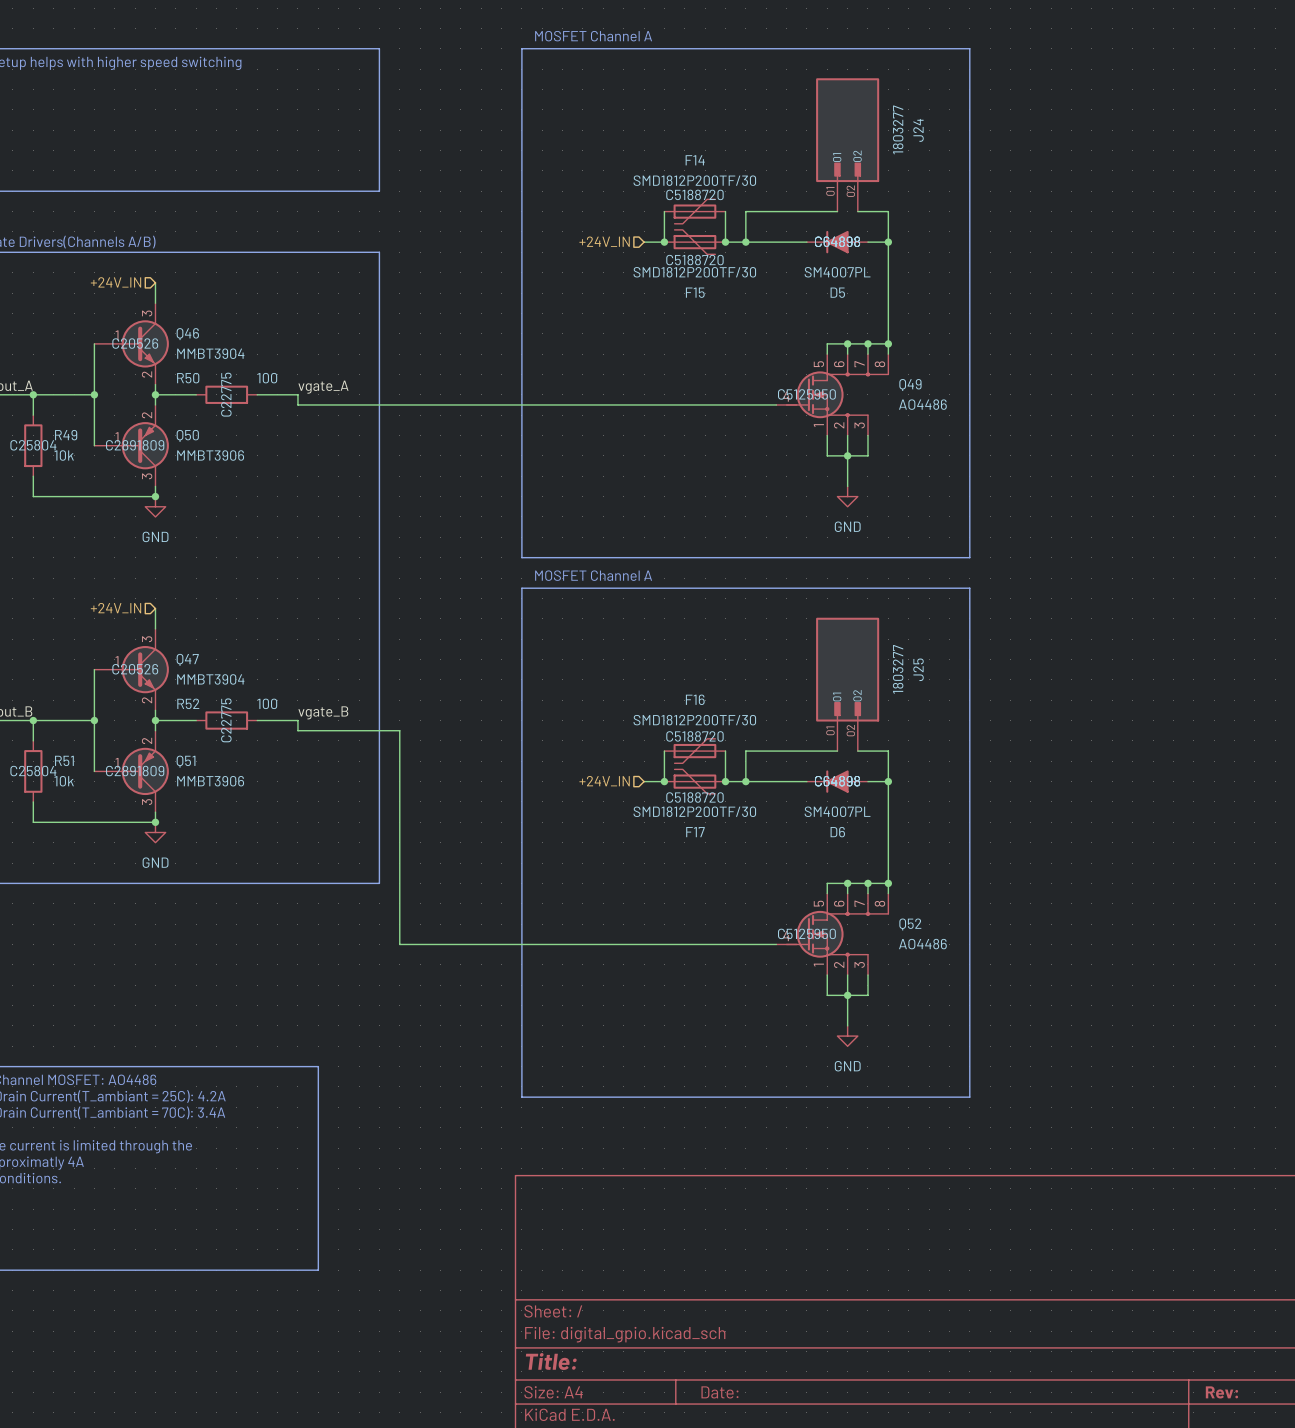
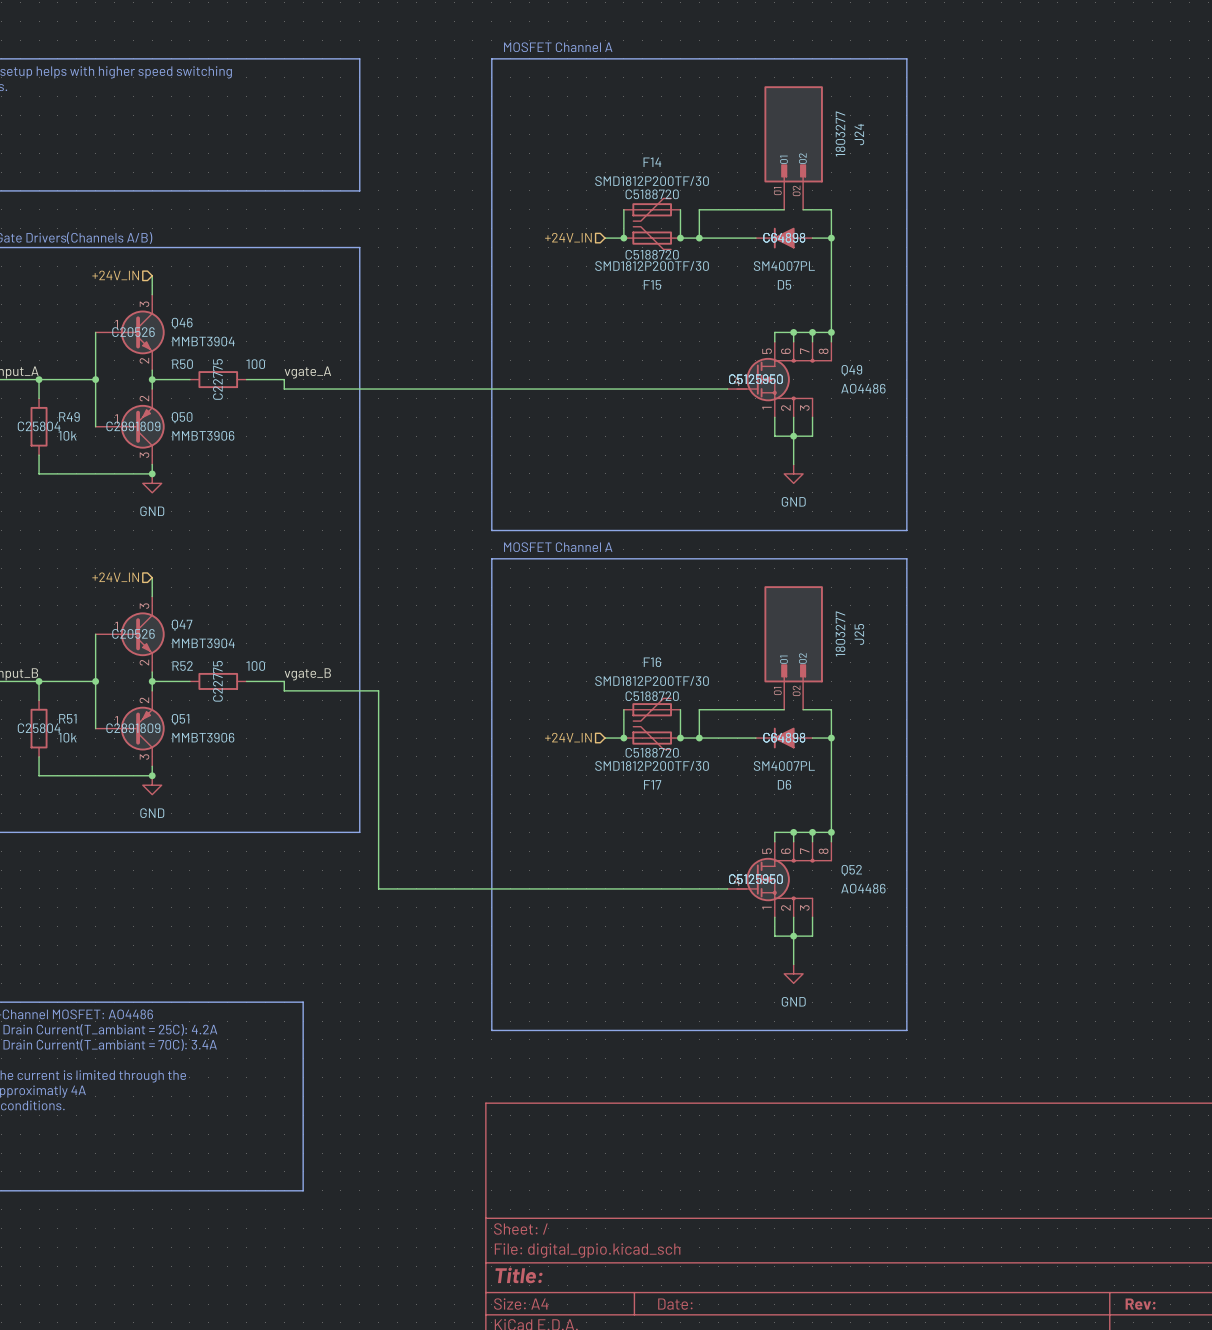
Q49 text: none -> C5125950 (755, 379)
Q52 text: none -> C5125950 (755, 879)

